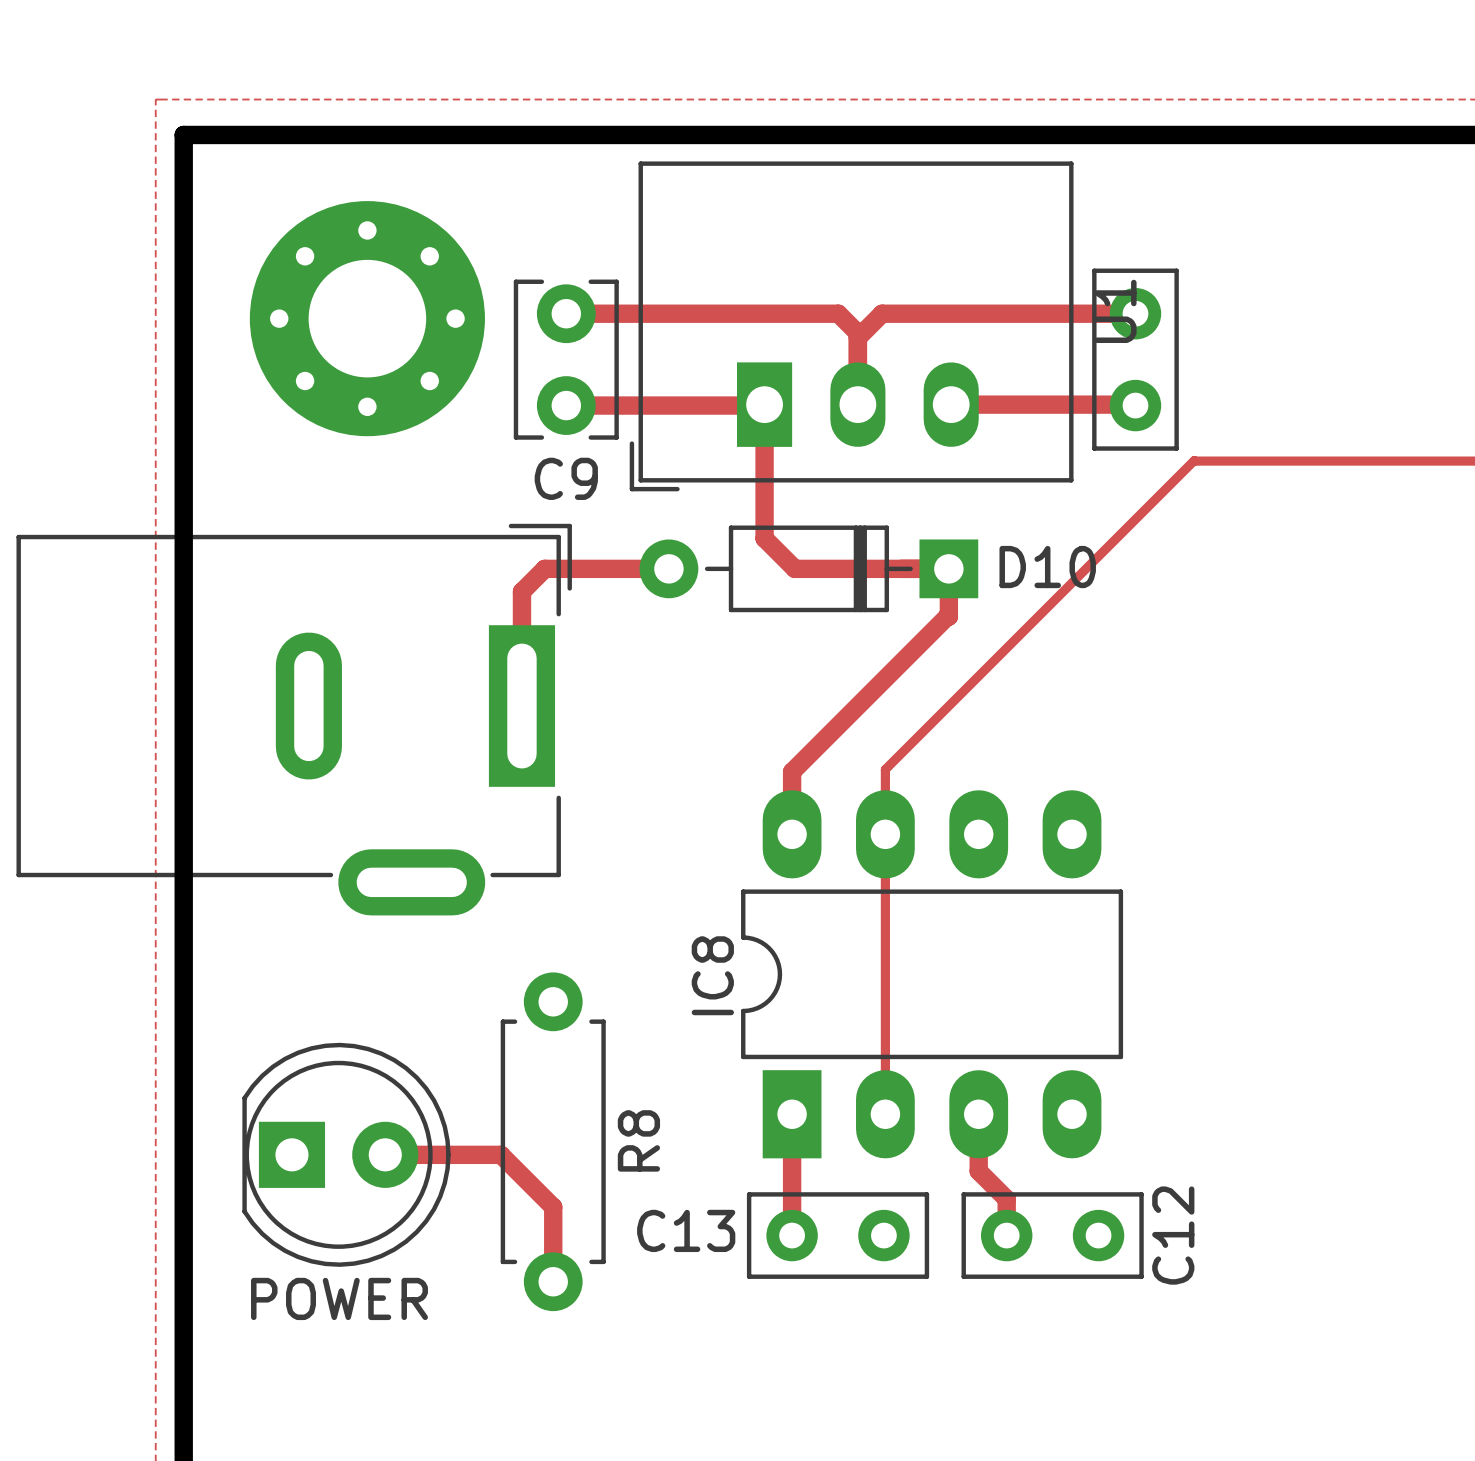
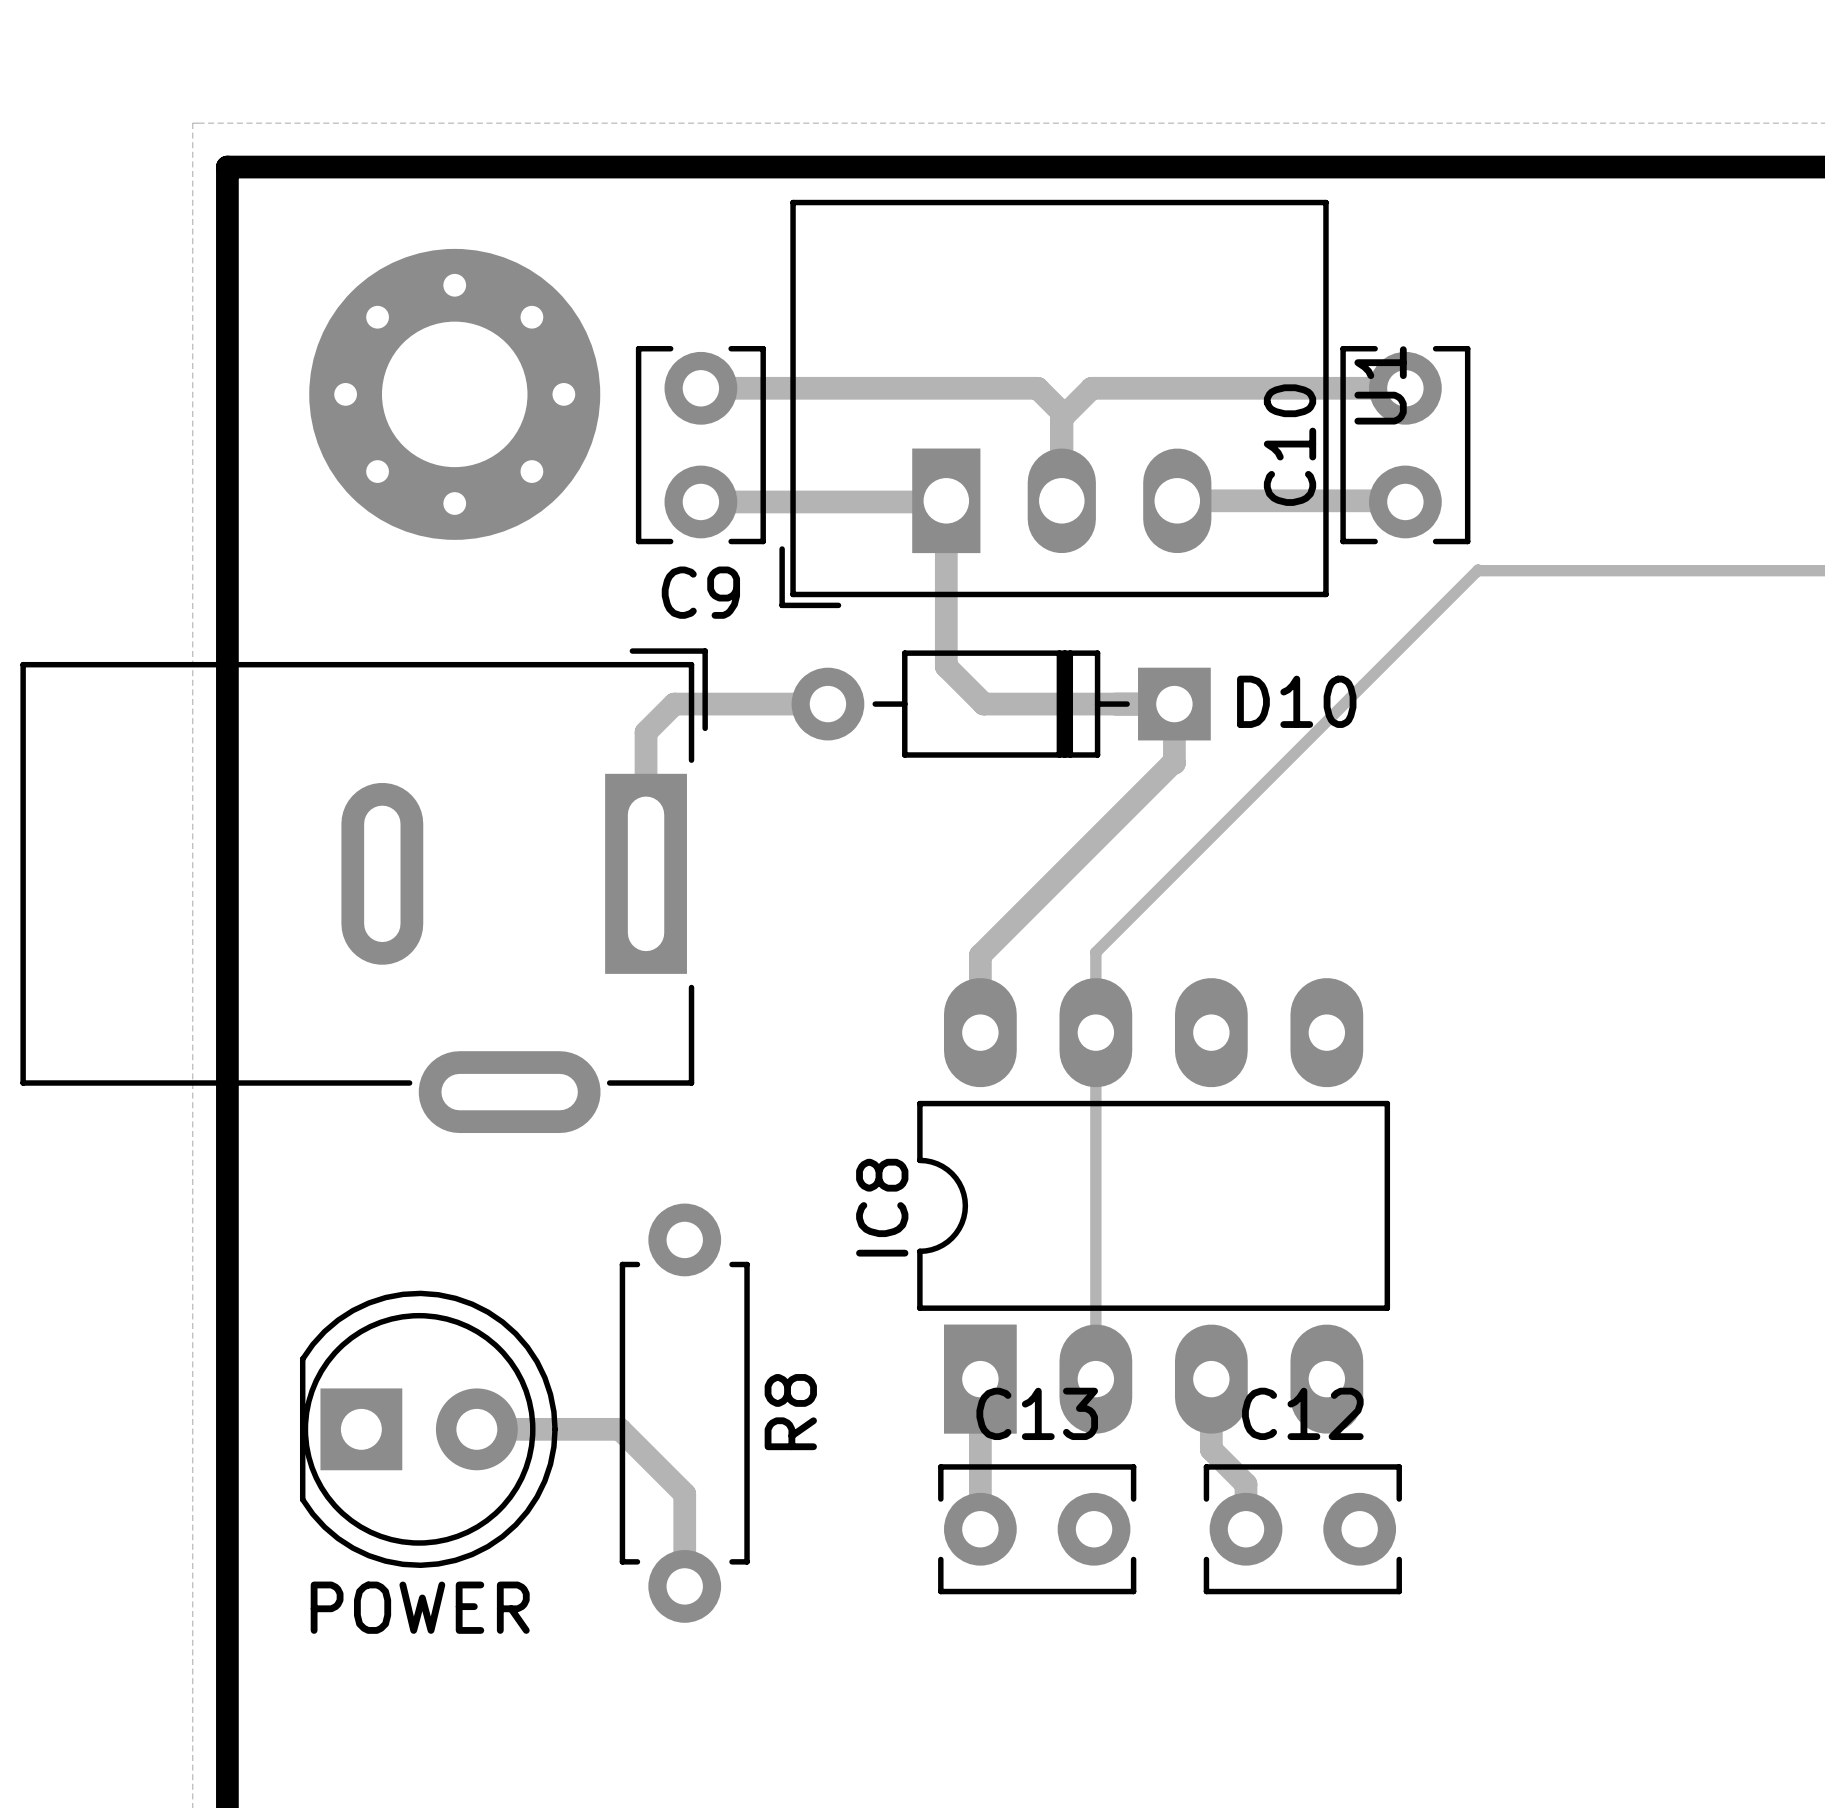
part: (1135, 359) -> none
C10: none -> (1405, 445)
C13 footprint: [746, 1192, 930, 1279] -> [938, 1464, 1137, 1595]
C12 footprint: [961, 1192, 1144, 1279] -> [1203, 1464, 1402, 1595]
C13 name position: C13 (686, 1230) -> C13 (1037, 1413)
C12 name rotation: 0° (1173, 1235) -> 90° clockwise (1302, 1413)
C12 name position: C12 (1173, 1235) -> C12 (1302, 1413)

